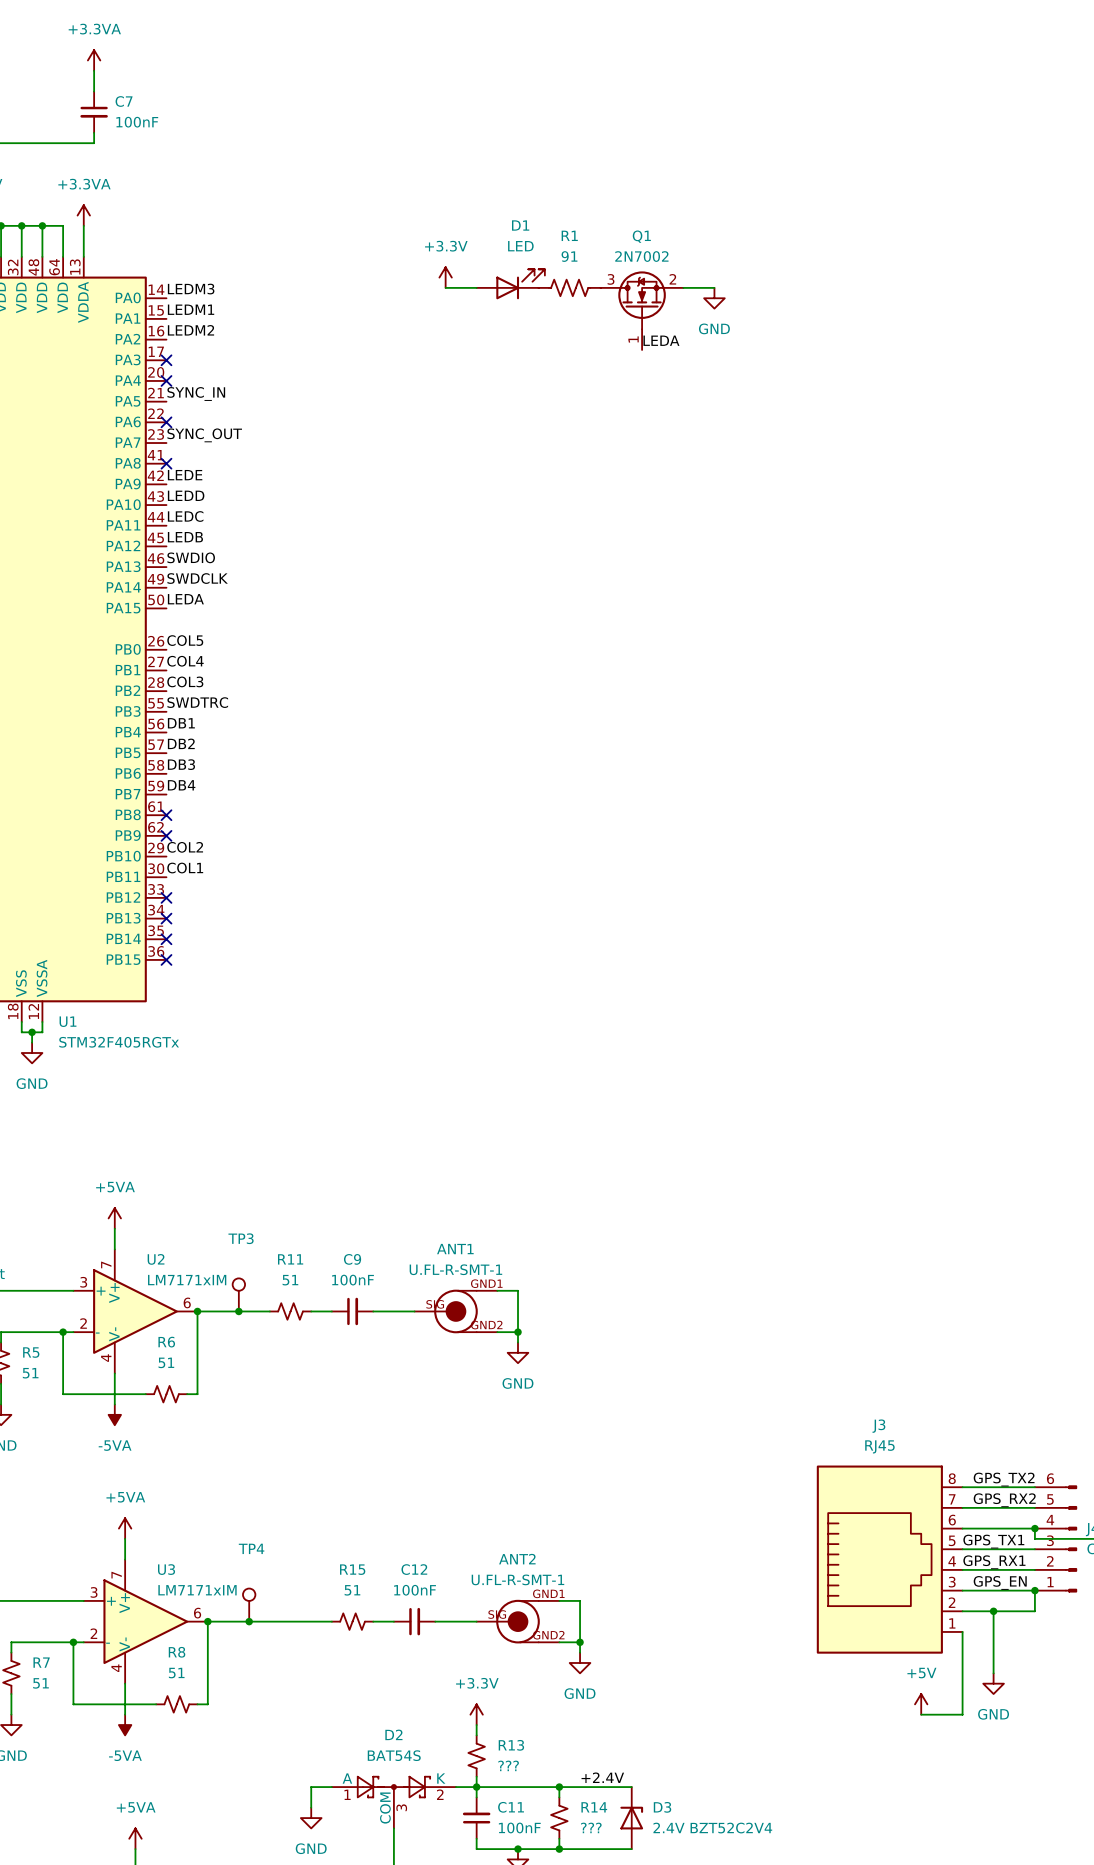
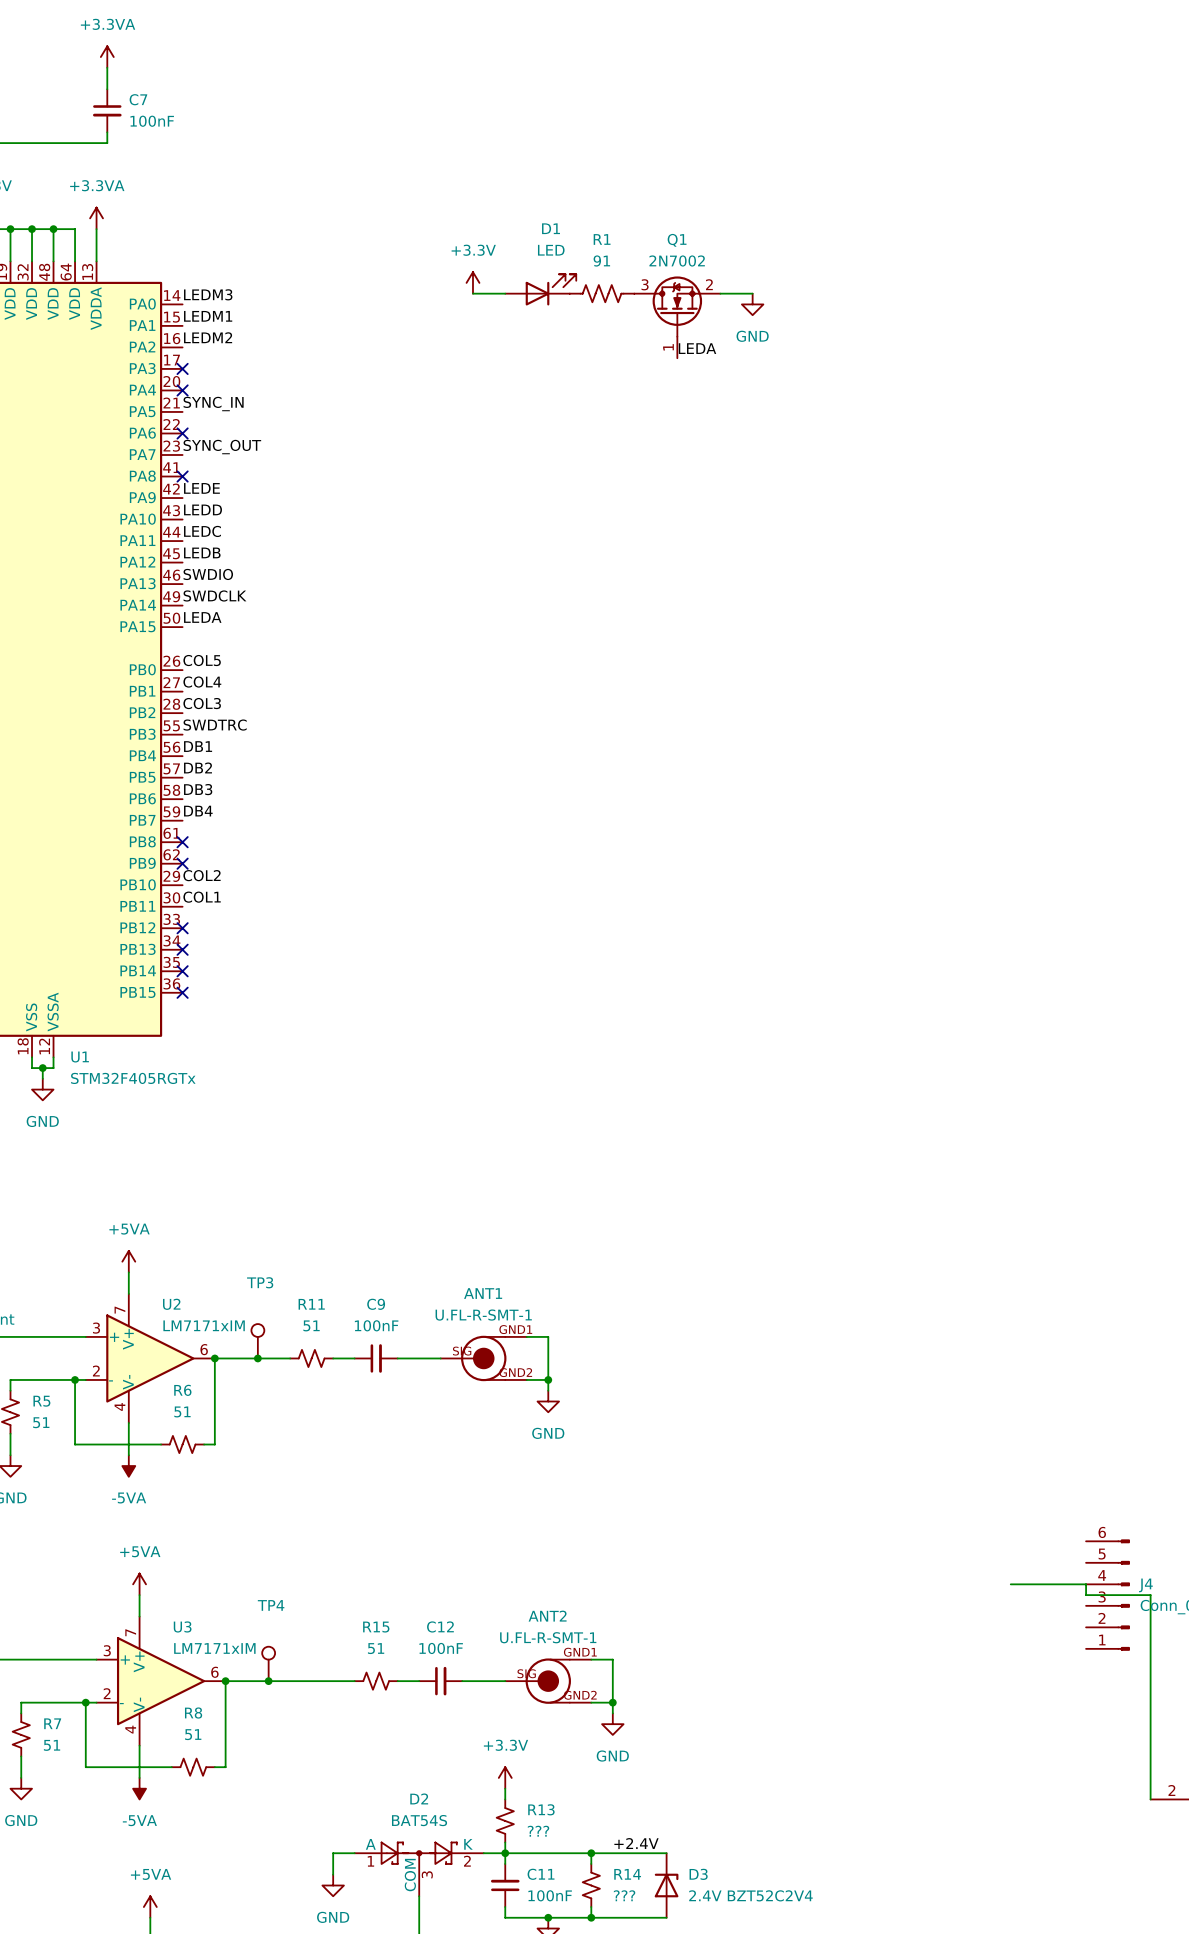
label: GPS_TX2 (1004, 1479) -> none
wire: (962, 1487) (1034, 1487) -> none
label: GPS_RX2 (1004, 1500) -> none
wire: (962, 1507) (1034, 1507) -> none
junction: (1034, 1528) -> none
label: GPS_TX1 (993, 1541) -> none
wire: (962, 1549) (1034, 1549) -> none
J3: RJ45 (889, 1559) -> none
label: GPS_RX1 (994, 1562) -> none
wire: (962, 1569) (1034, 1569) -> none
label: GPS_EN (1000, 1582) -> none
wire: (962, 1590) (1034, 1590) (1034, 1611) (962, 1611) -> none
junction: (1034, 1590) -> none
wire: (993, 1611) (993, 1673) -> none
junction: (993, 1611) -> none
wire: (962, 1631) (962, 1714) (921, 1714) -> none
power symbol: GND (993, 1683) -> none
power symbol: +5V (921, 1704) -> none

